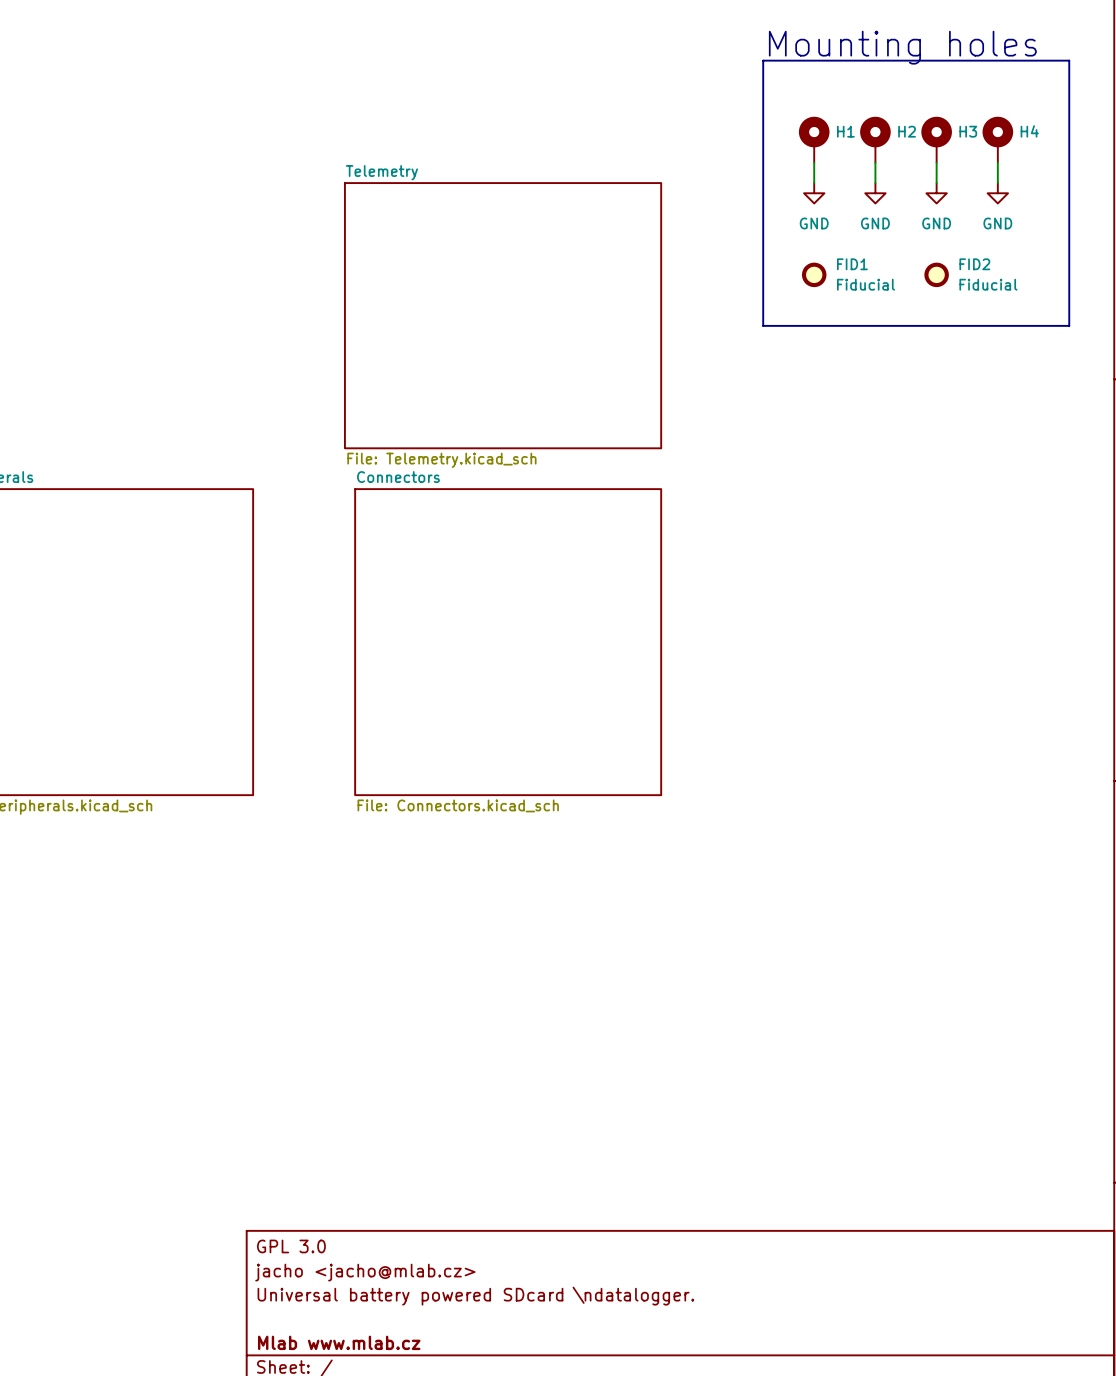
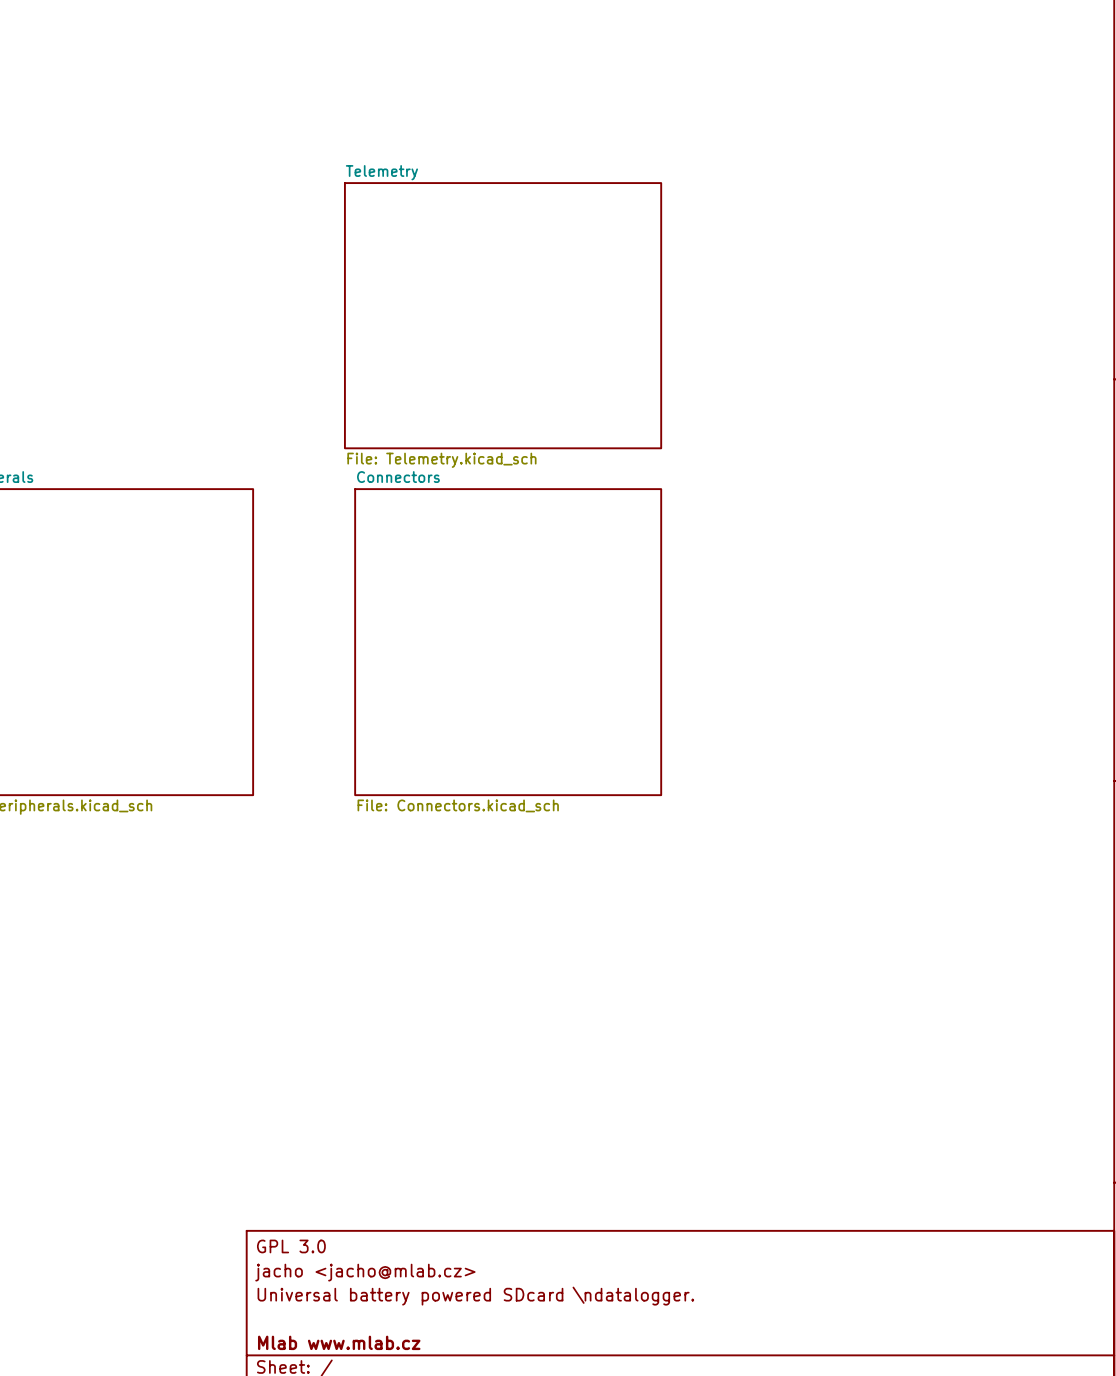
text: Mounting holes (902, 47) -> none
line: (763, 60) (763, 325) (1069, 325) (1069, 60) (763, 60) -> none
H1: (814, 139) -> none
H2: (875, 139) -> none
H3: (936, 139) -> none
H4: (997, 139) -> none
wire: (814, 162) (814, 183) -> none
wire: (875, 162) (875, 183) -> none
wire: (936, 162) (936, 183) -> none
wire: (997, 162) (997, 183) -> none
power symbol: GND (814, 193) -> none
power symbol: GND (875, 193) -> none
power symbol: GND (936, 193) -> none
power symbol: GND (997, 193) -> none
FID1: Fiducial (814, 274) -> none
FID2: Fiducial (936, 274) -> none

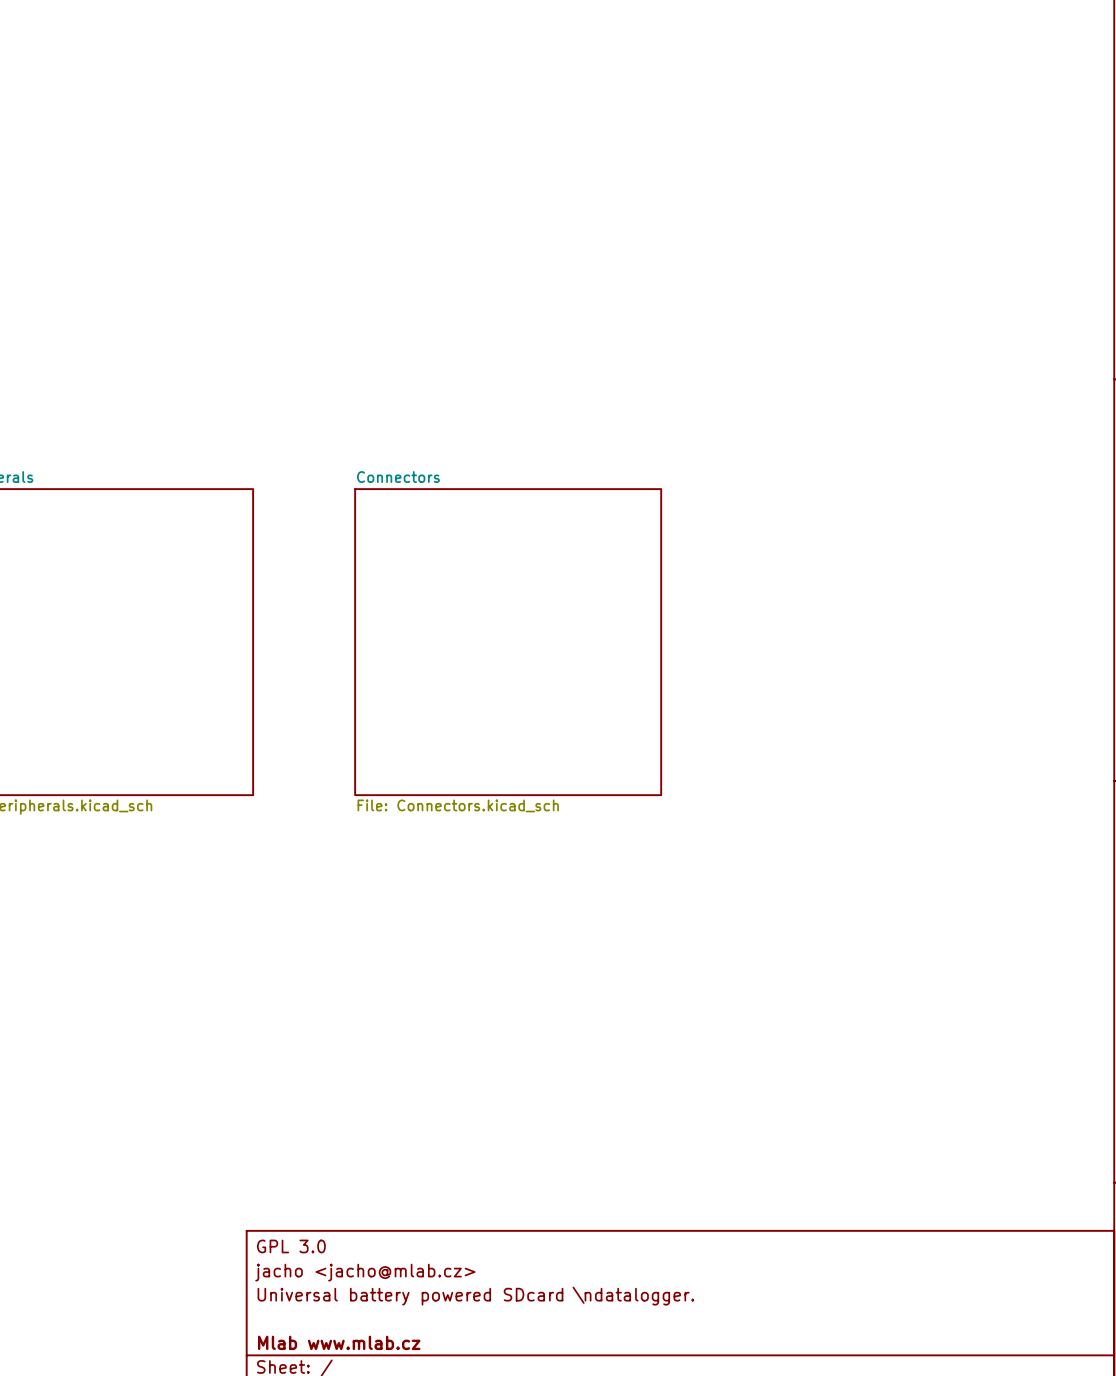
sheet Telemetry: File: Telemetry.kicad_sch (503, 315) -> none

